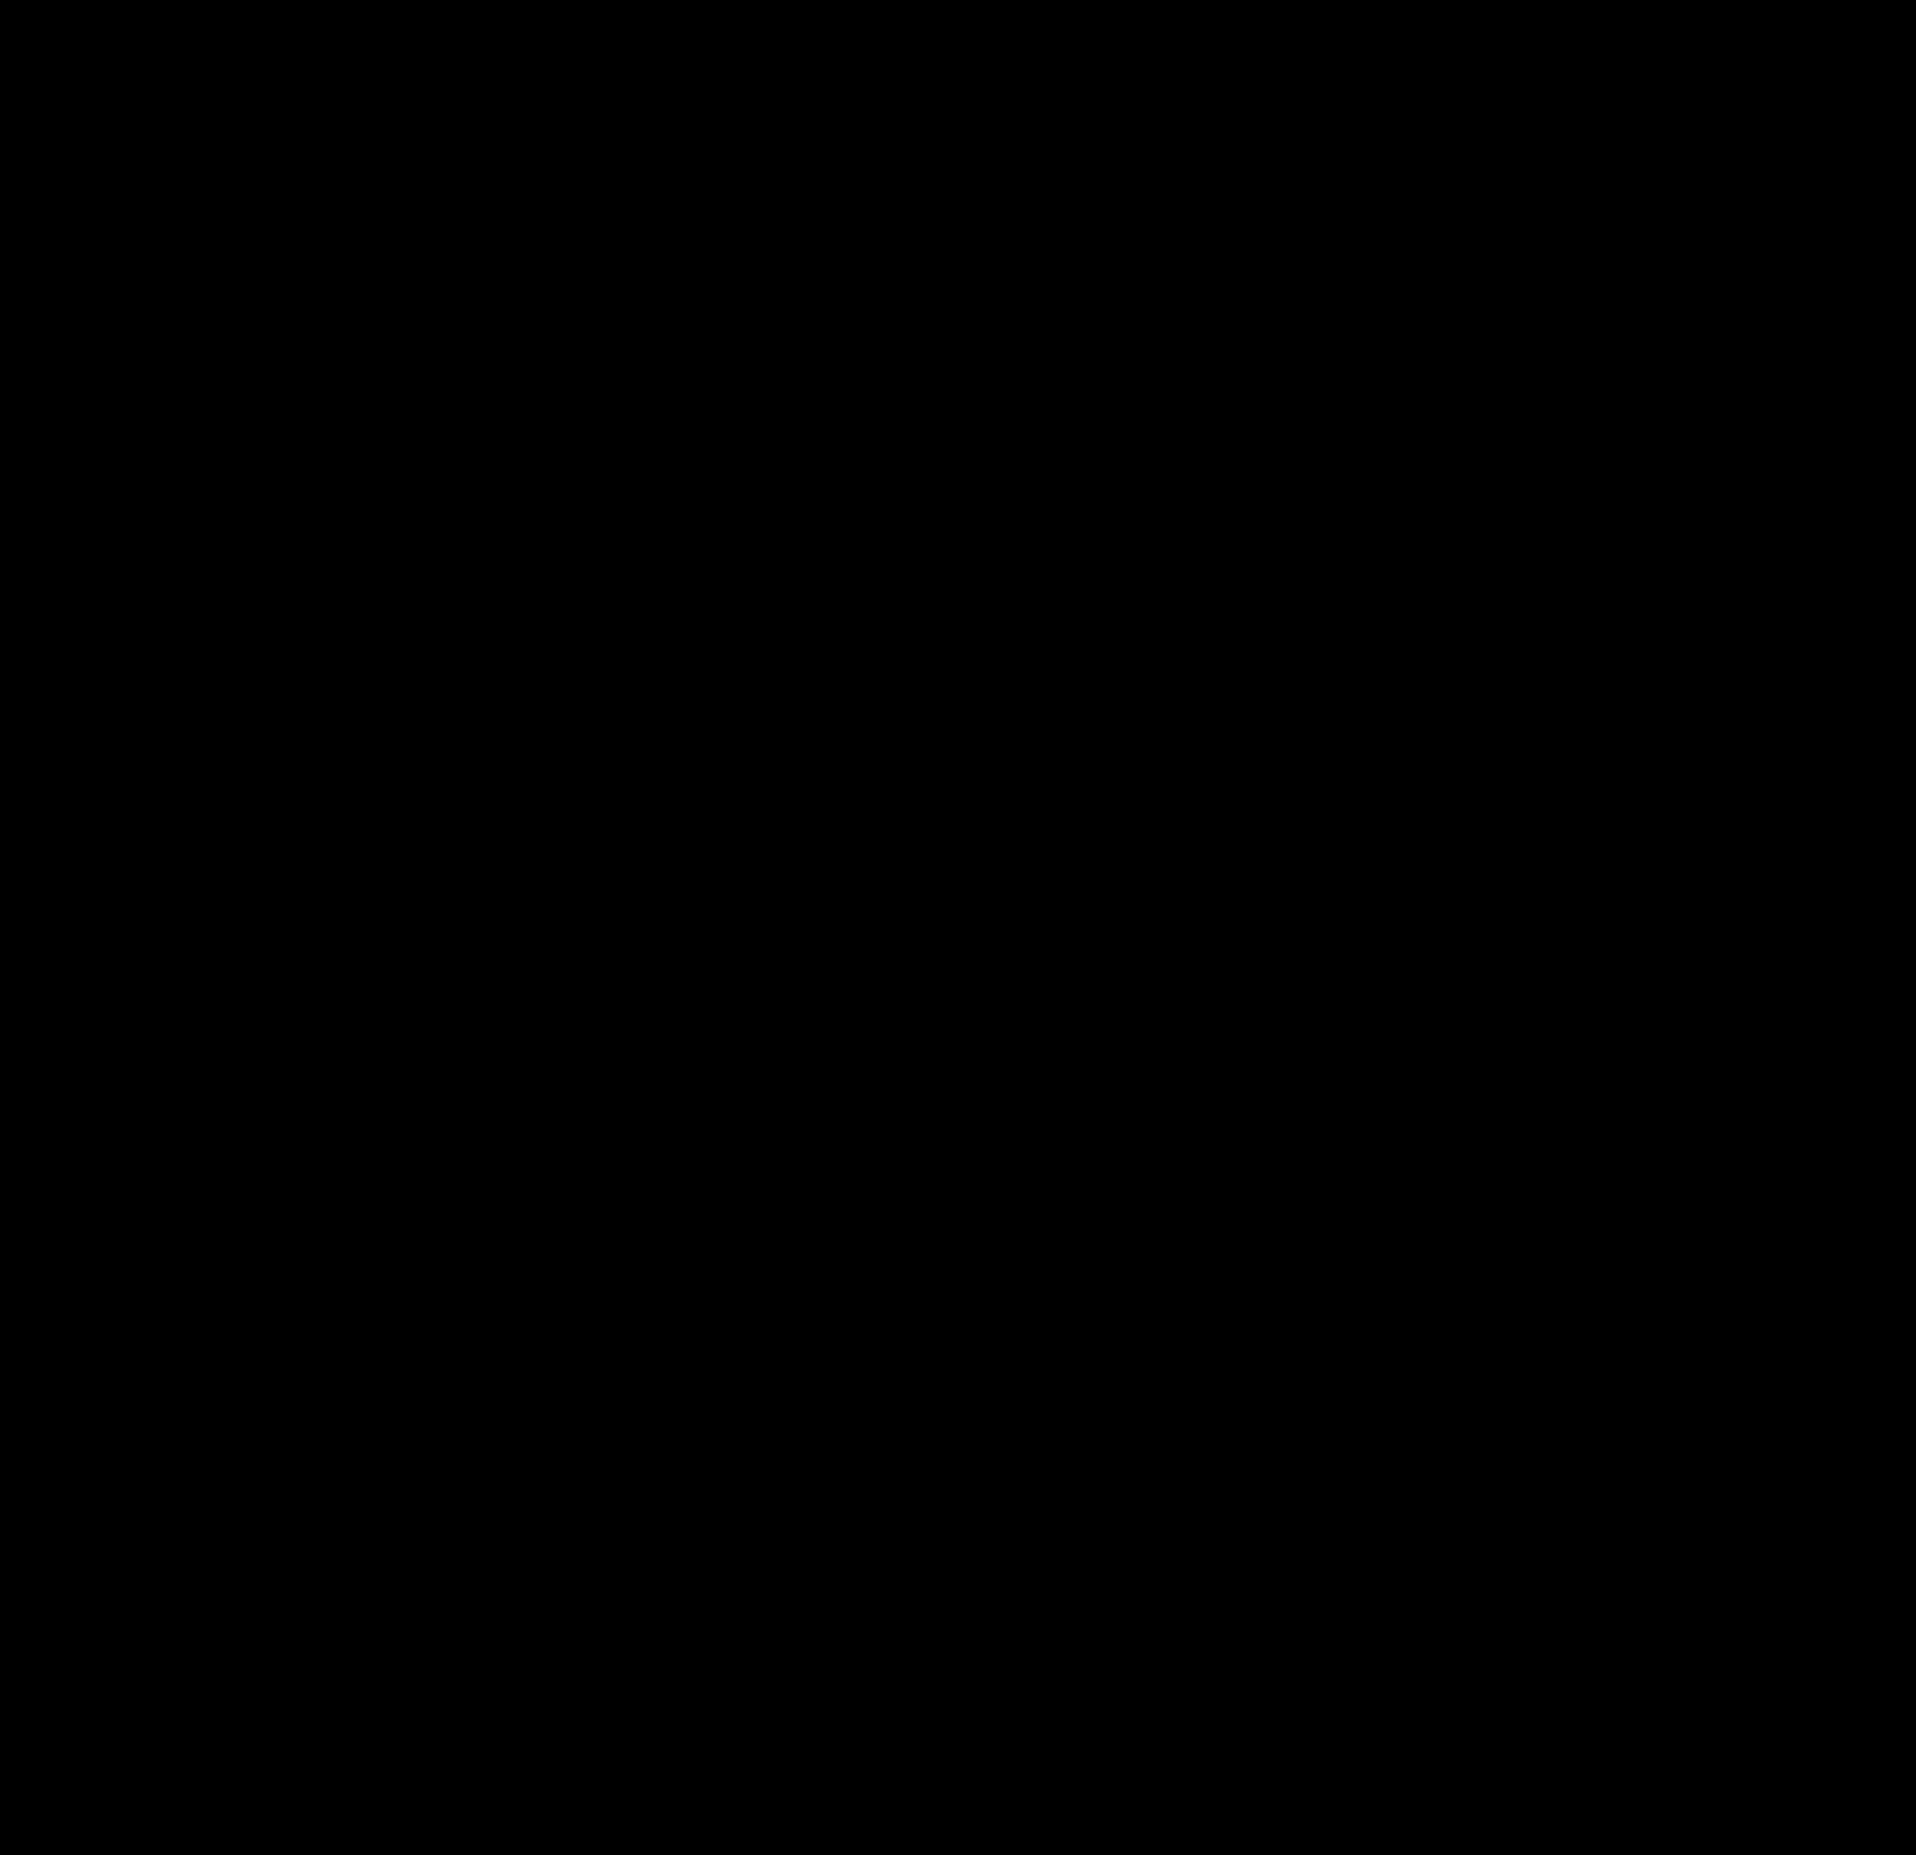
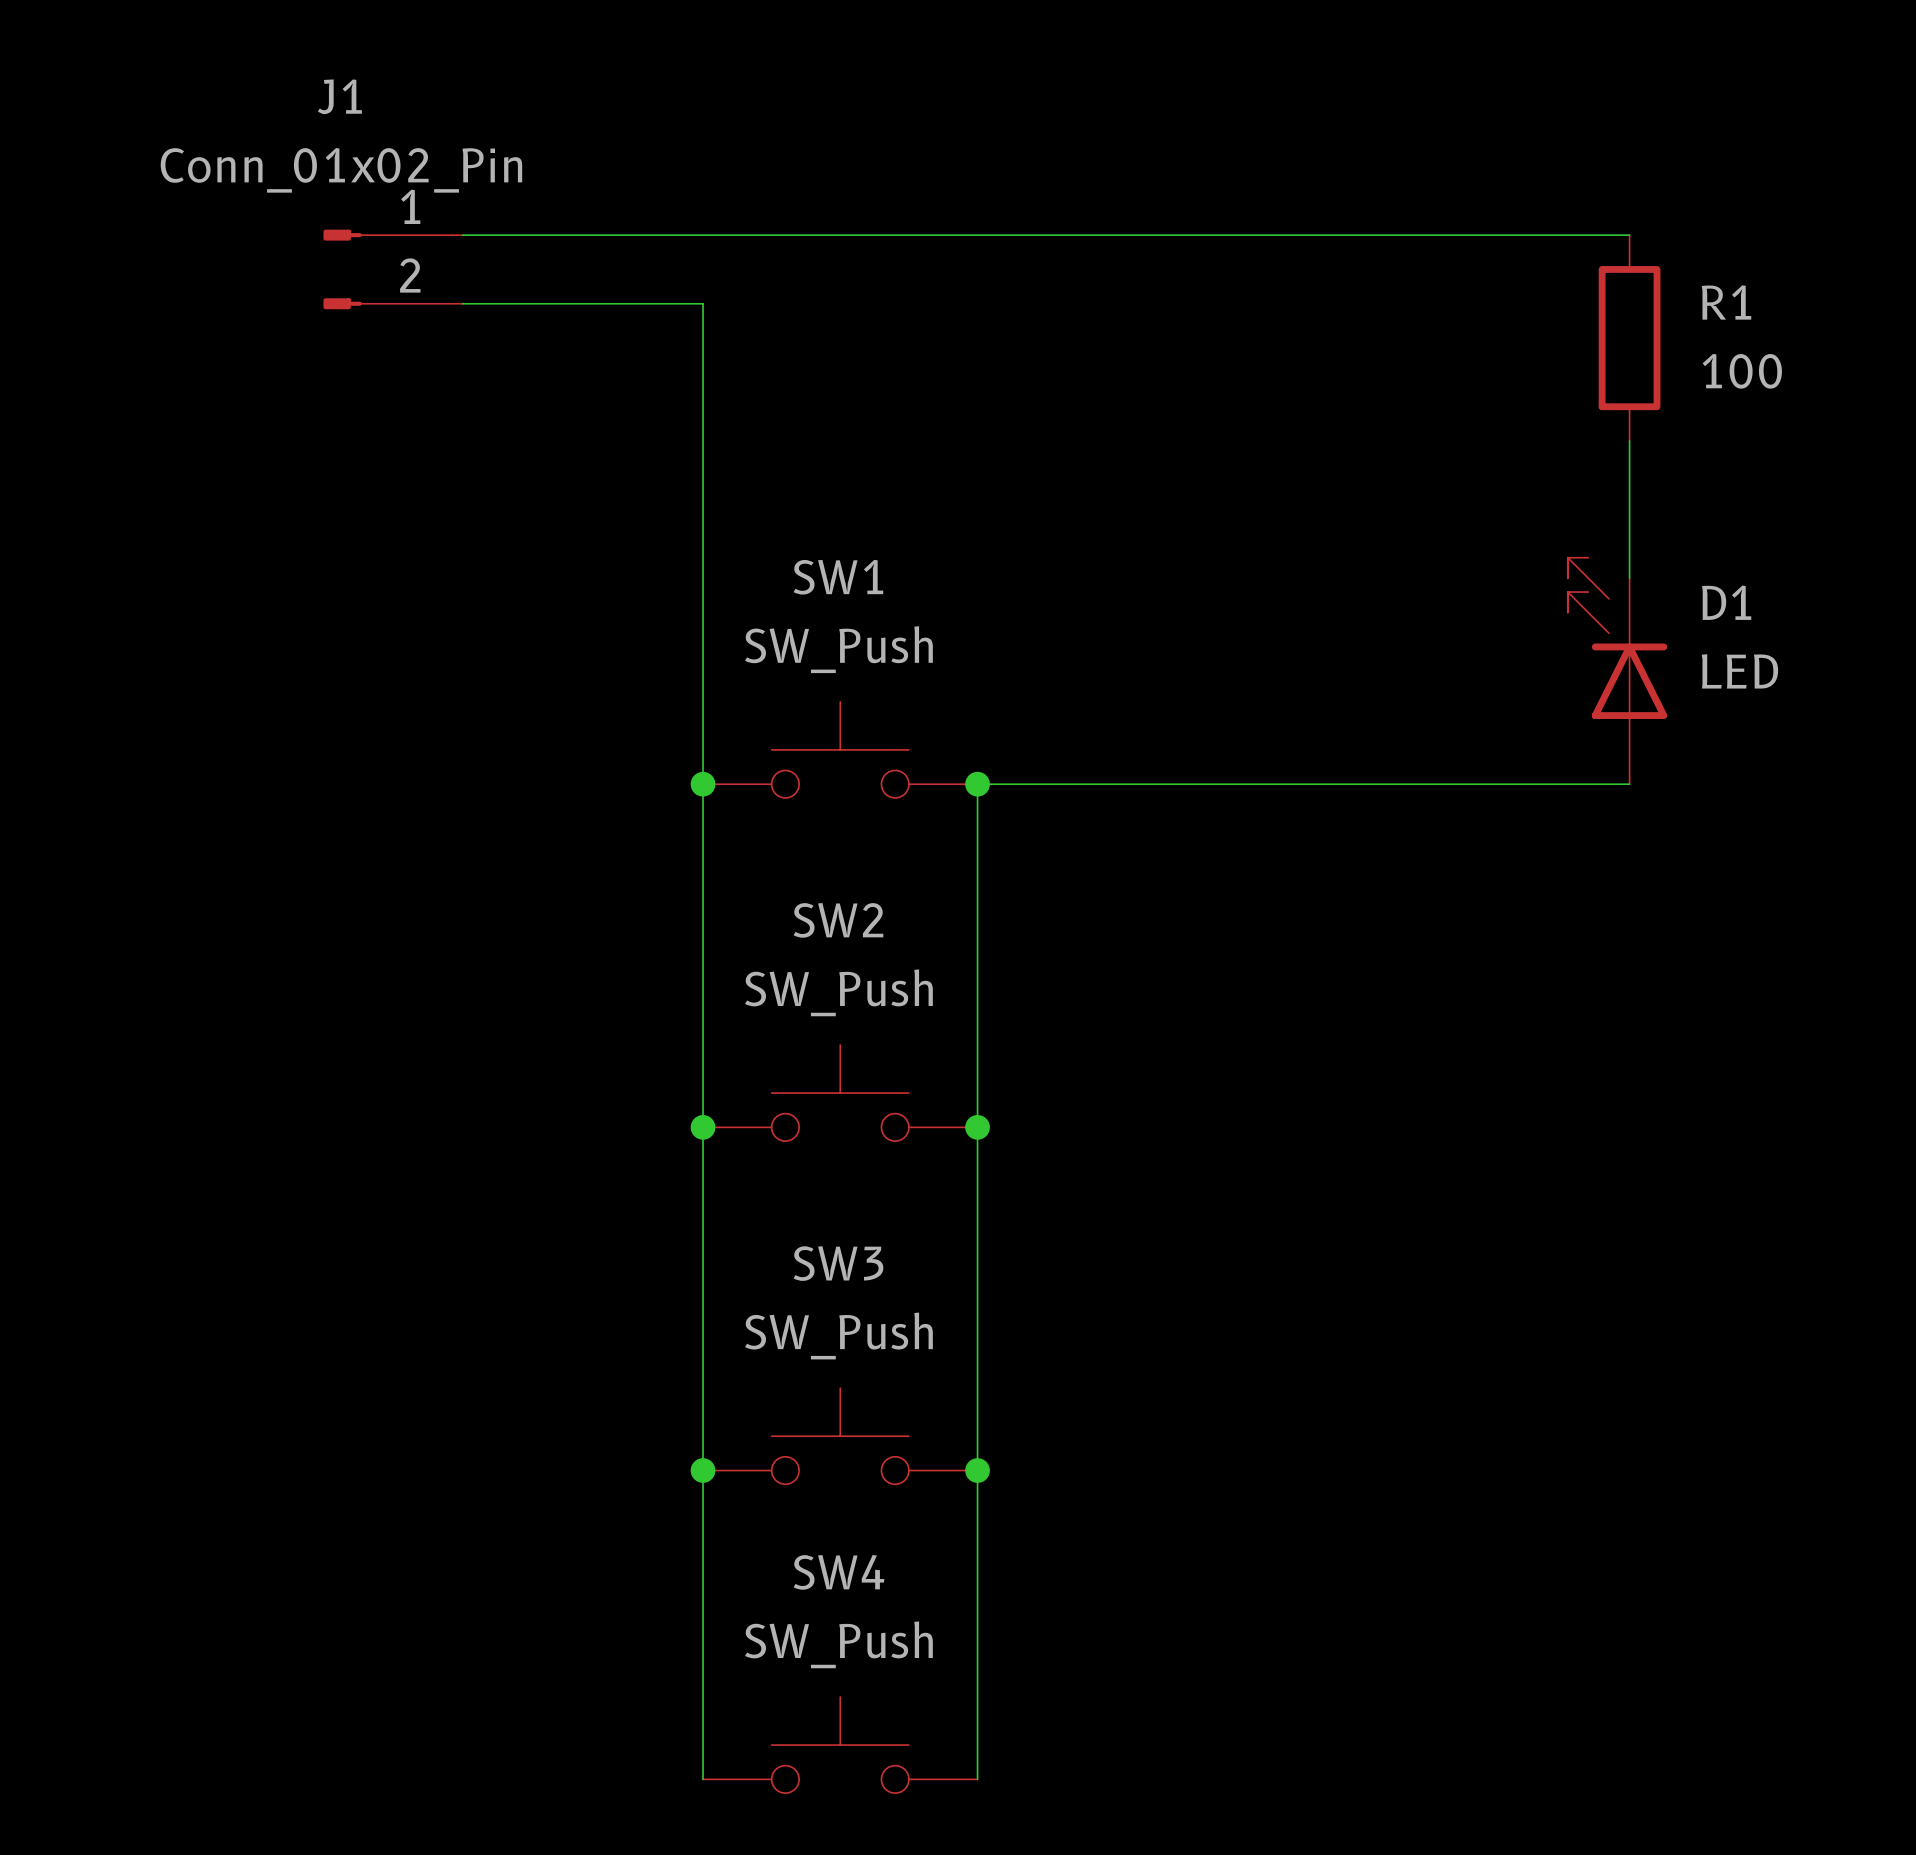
wire: none -> (462, 235) (1629, 235)
J1: none -> Conn_01x02_Pin (393, 269)
wire: none -> (462, 303) (703, 303) (703, 1779)
R1: none -> 100 (1629, 338)
wire: none -> (1629, 441) (1629, 578)
D1: none -> LED (1617, 670)
SW1: none -> SW_Push (840, 749)
junction: none -> (703, 784)
junction: none -> (977, 784)
wire: none -> (1629, 784) (977, 784) (977, 1779)
SW2: none -> SW_Push (840, 1093)
junction: none -> (703, 1127)
junction: none -> (977, 1127)
SW3: none -> SW_Push (840, 1436)
junction: none -> (703, 1470)
junction: none -> (977, 1470)
SW4: none -> SW_Push (840, 1745)

